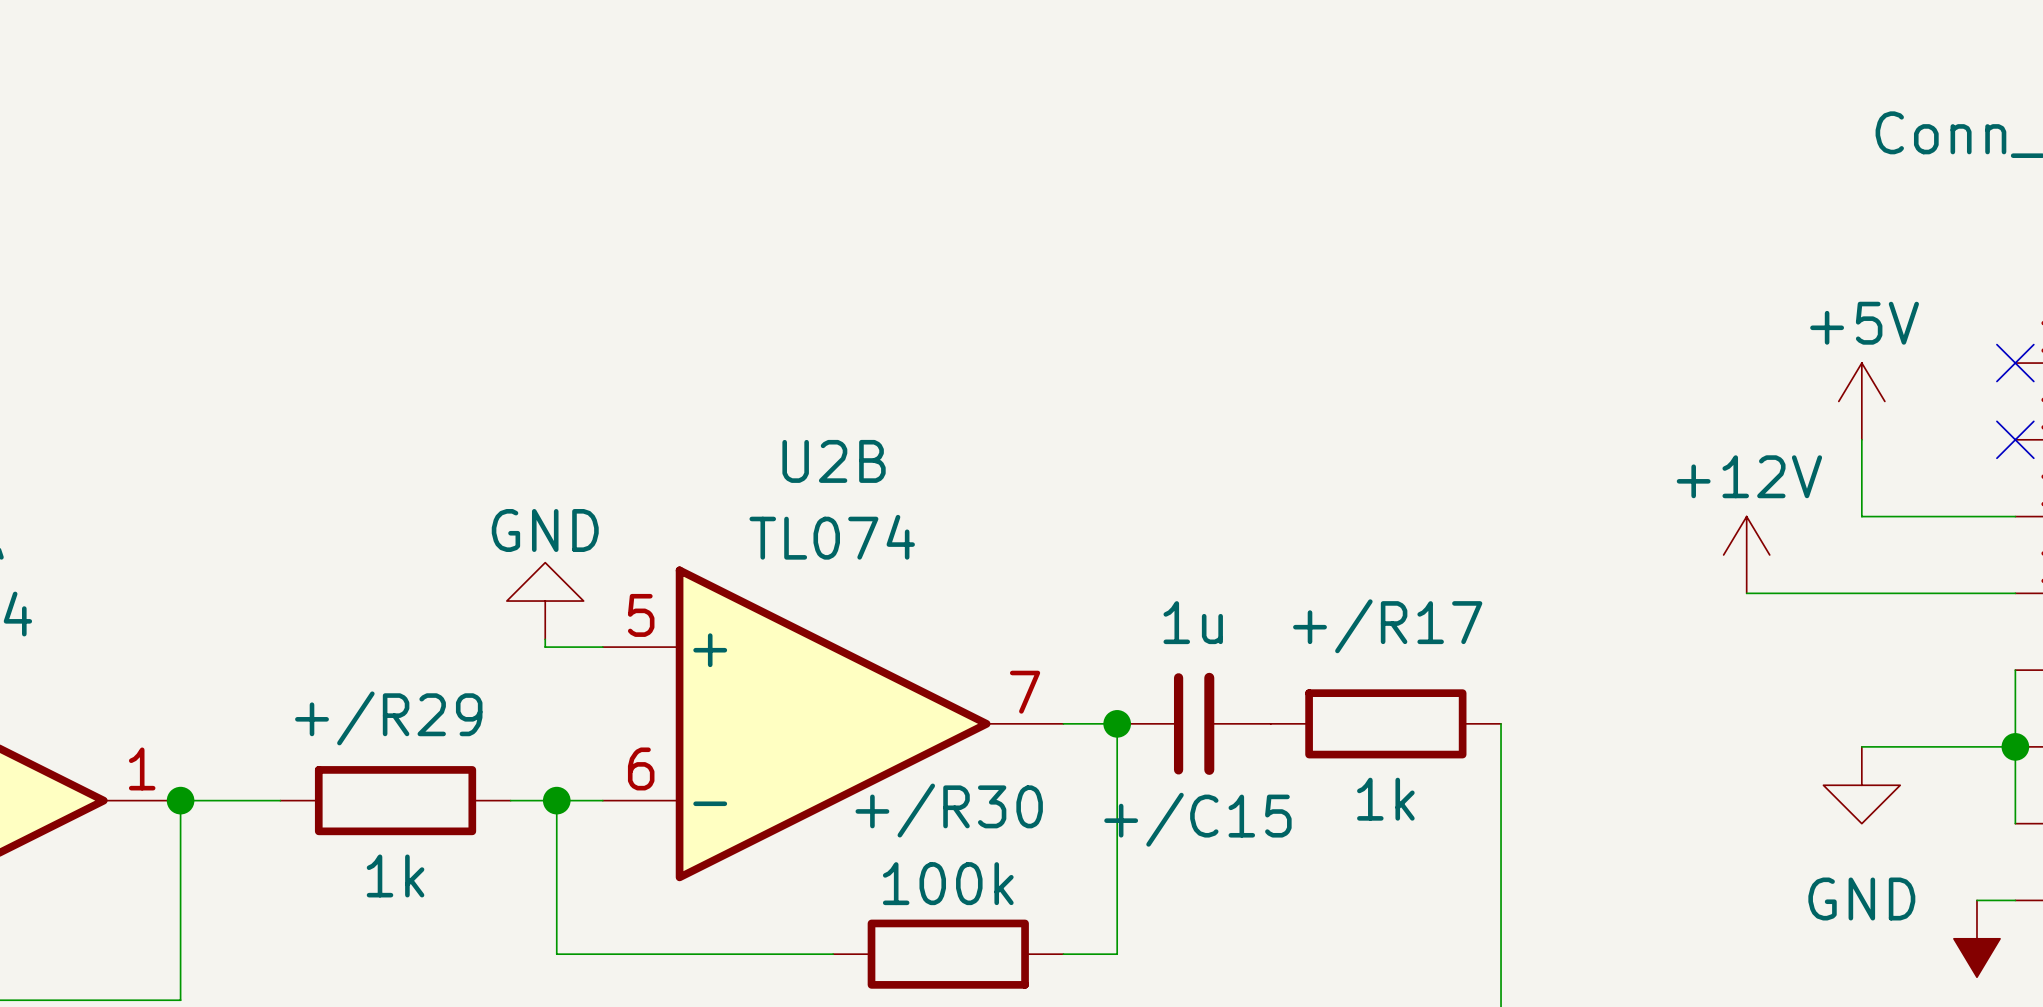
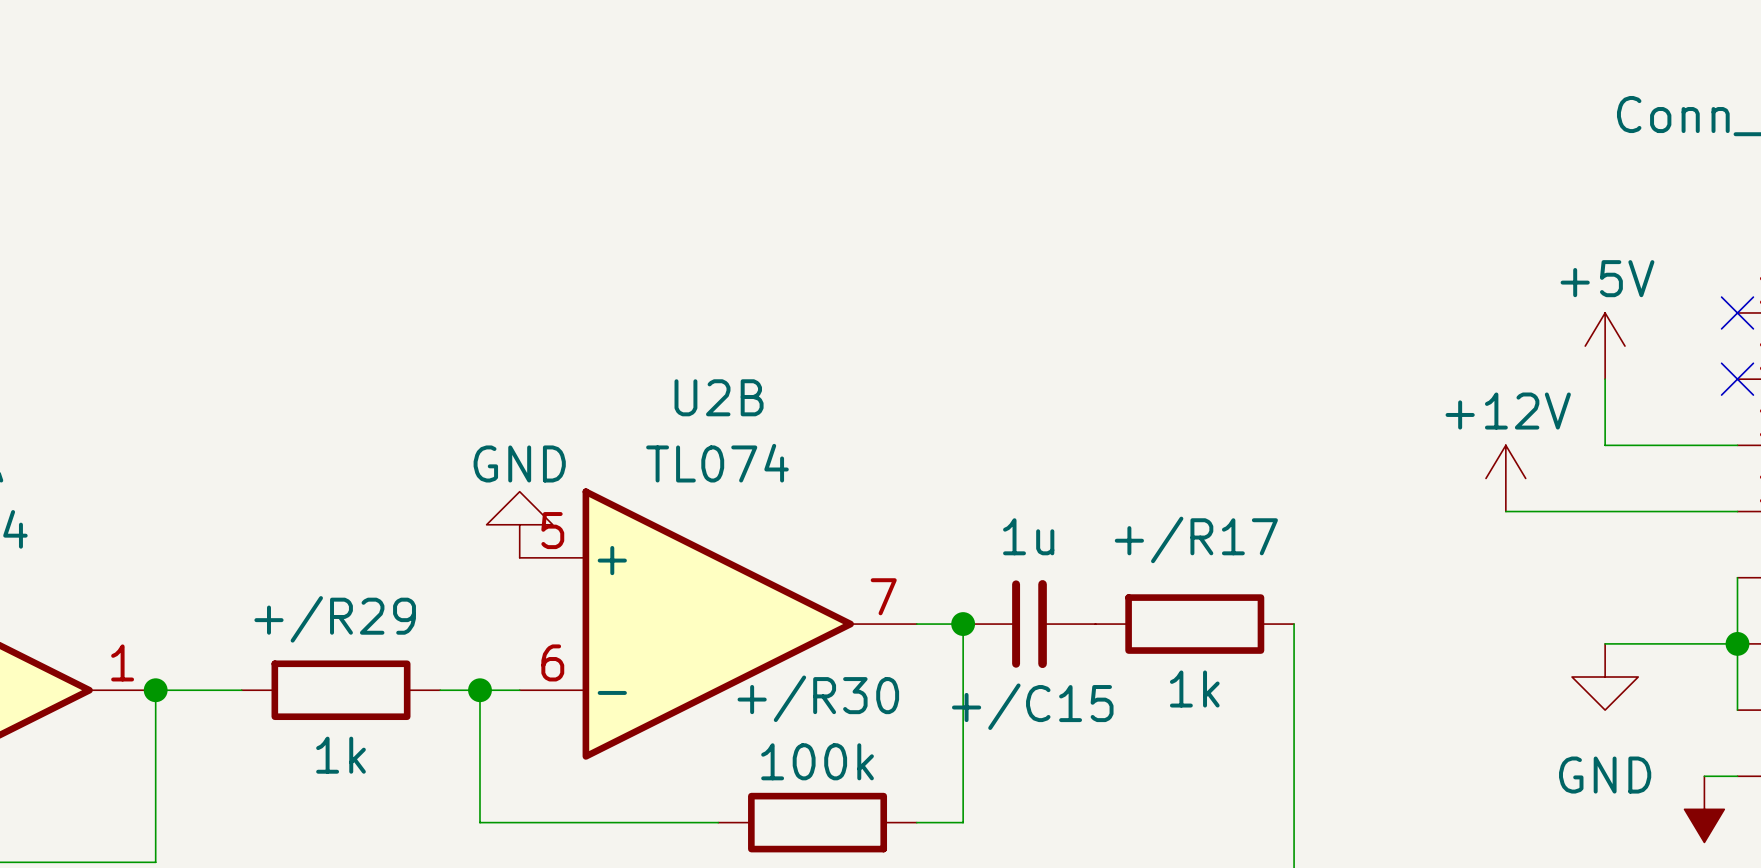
power symbol position: GND (545, 601) -> GND (519, 524)
wire: (545, 639) (545, 647) (602, 647) -> none

